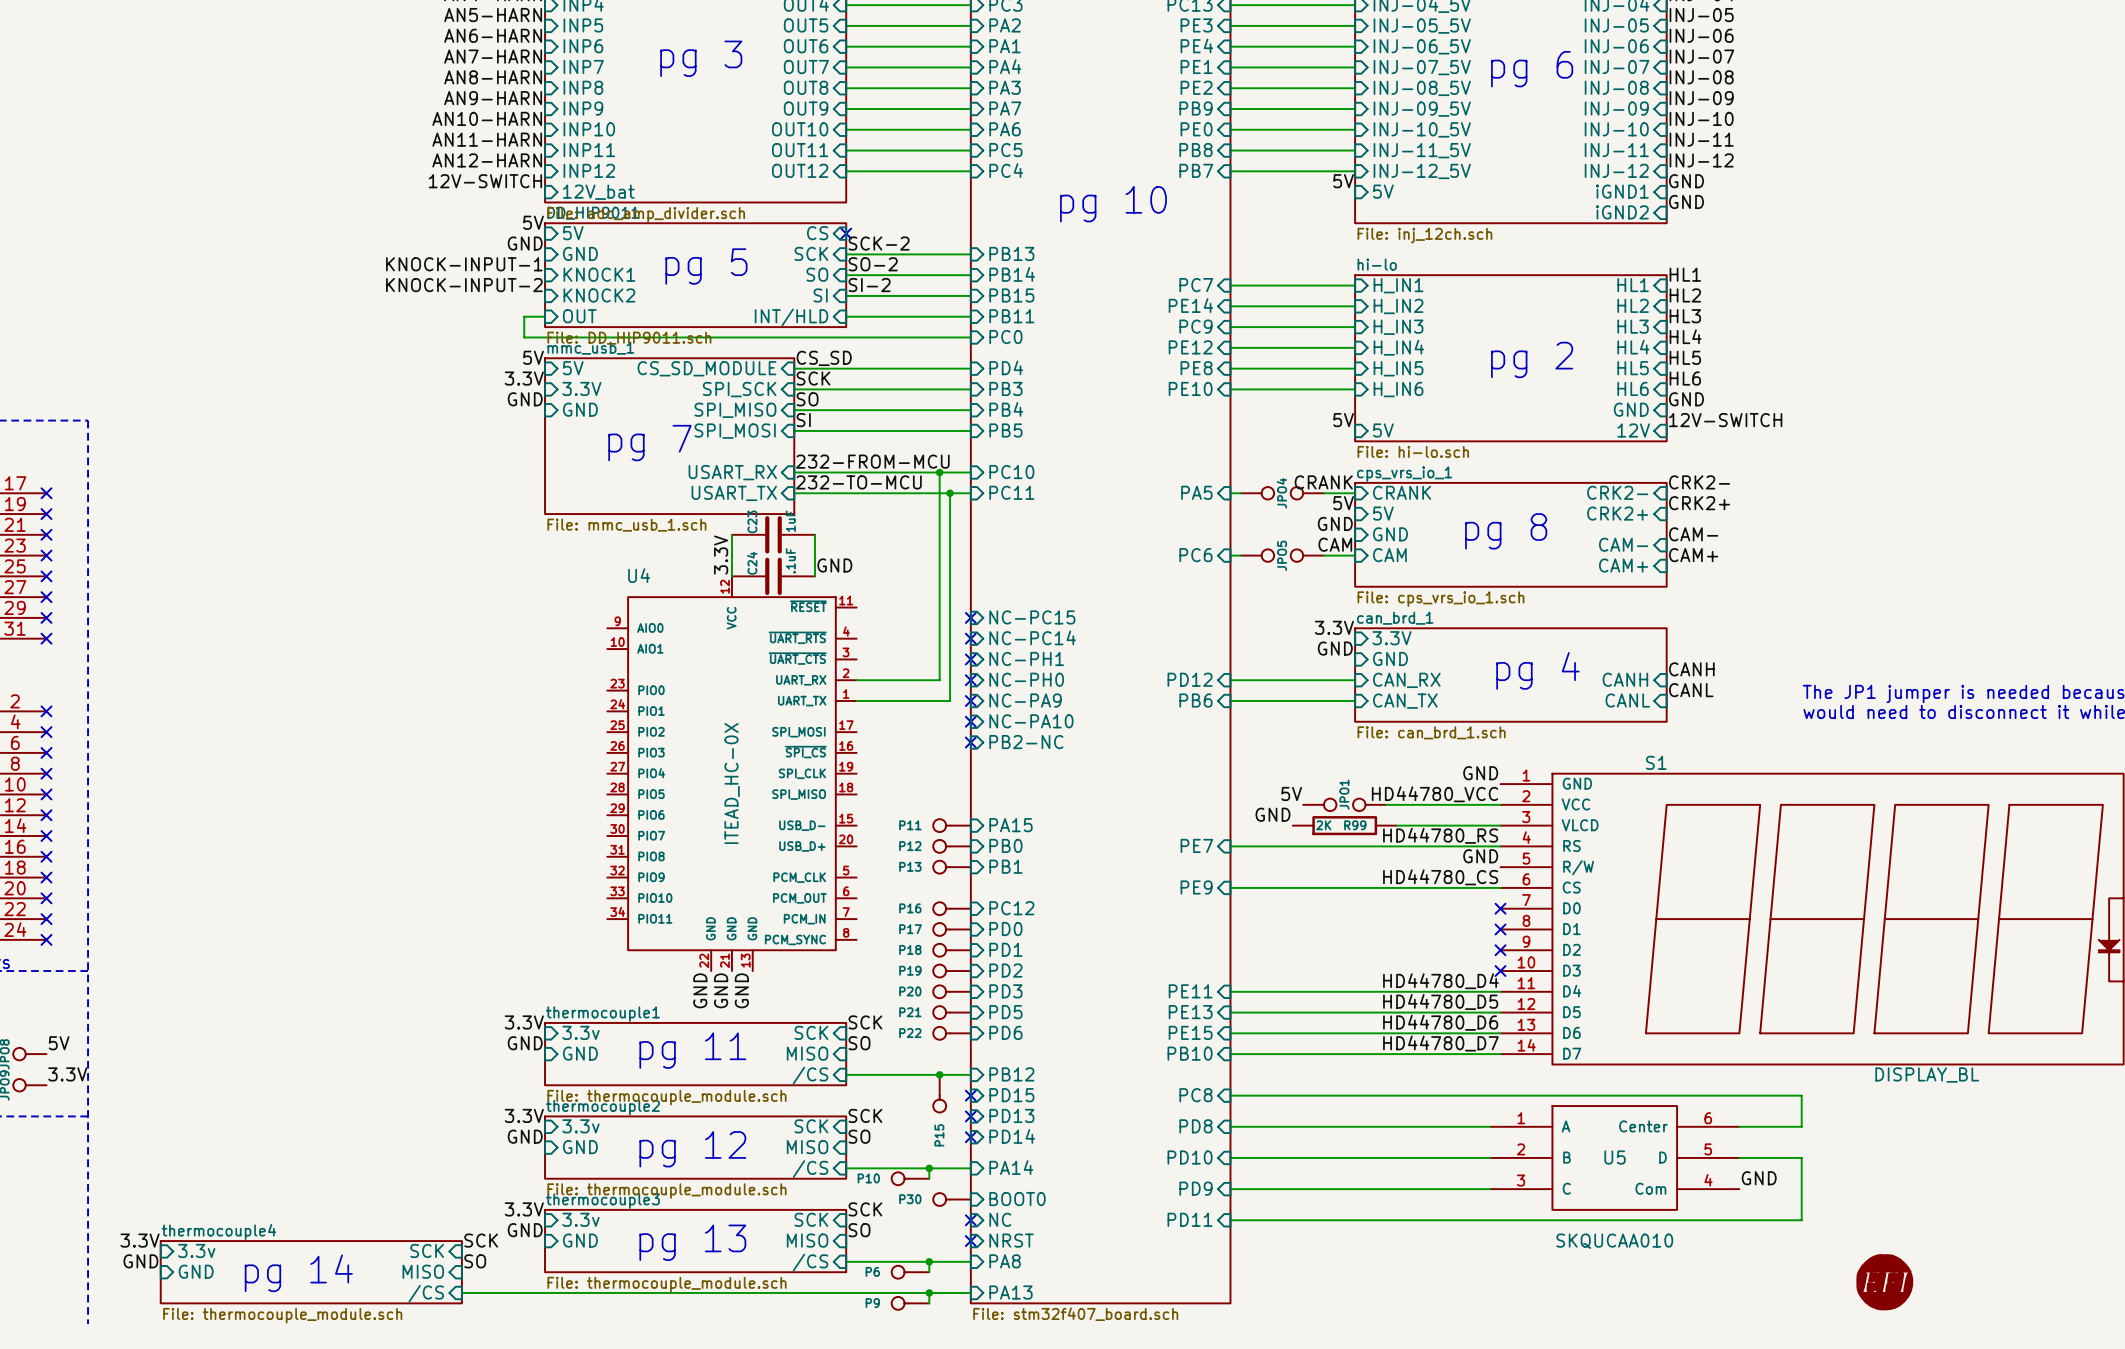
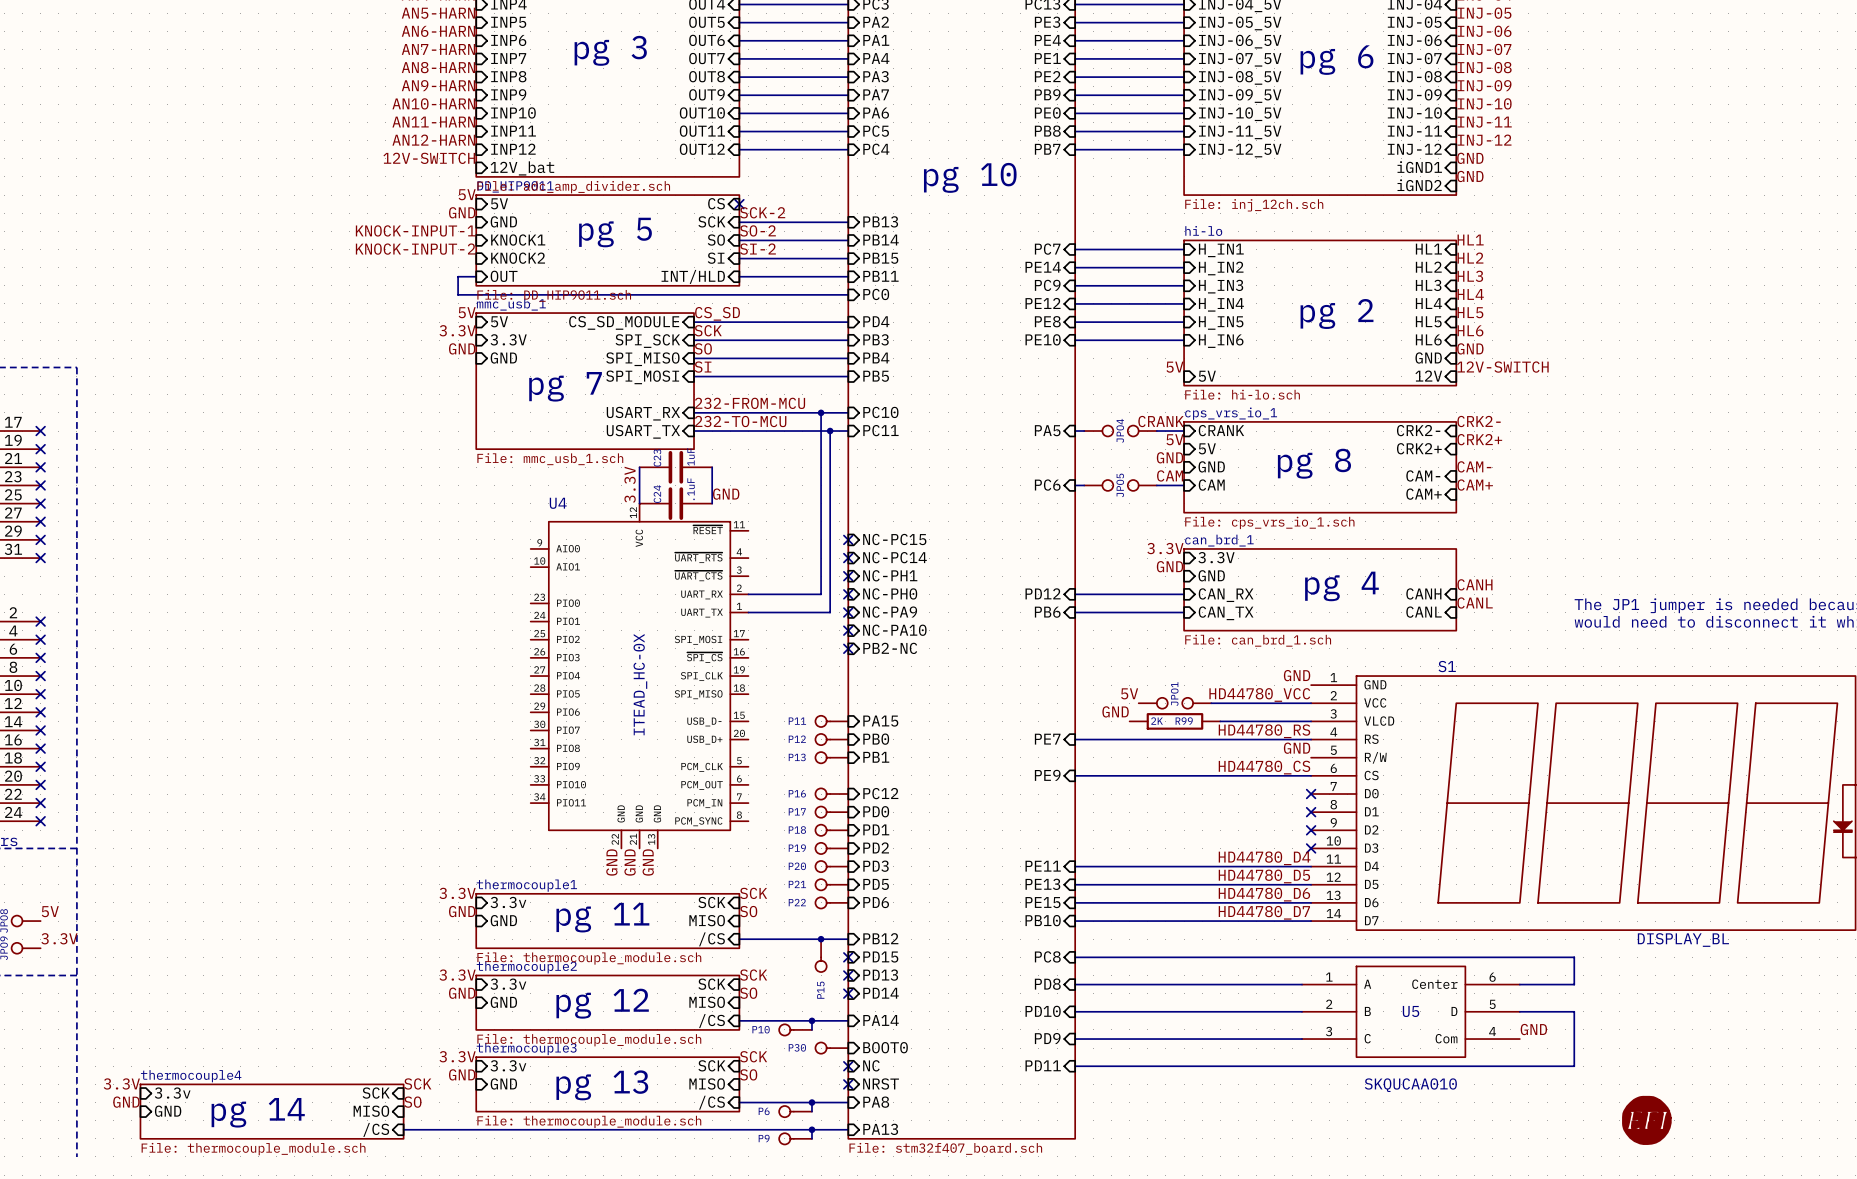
label: 5V (1343, 181) -> none
sheet pin: 5V (1383, 191) -> none

